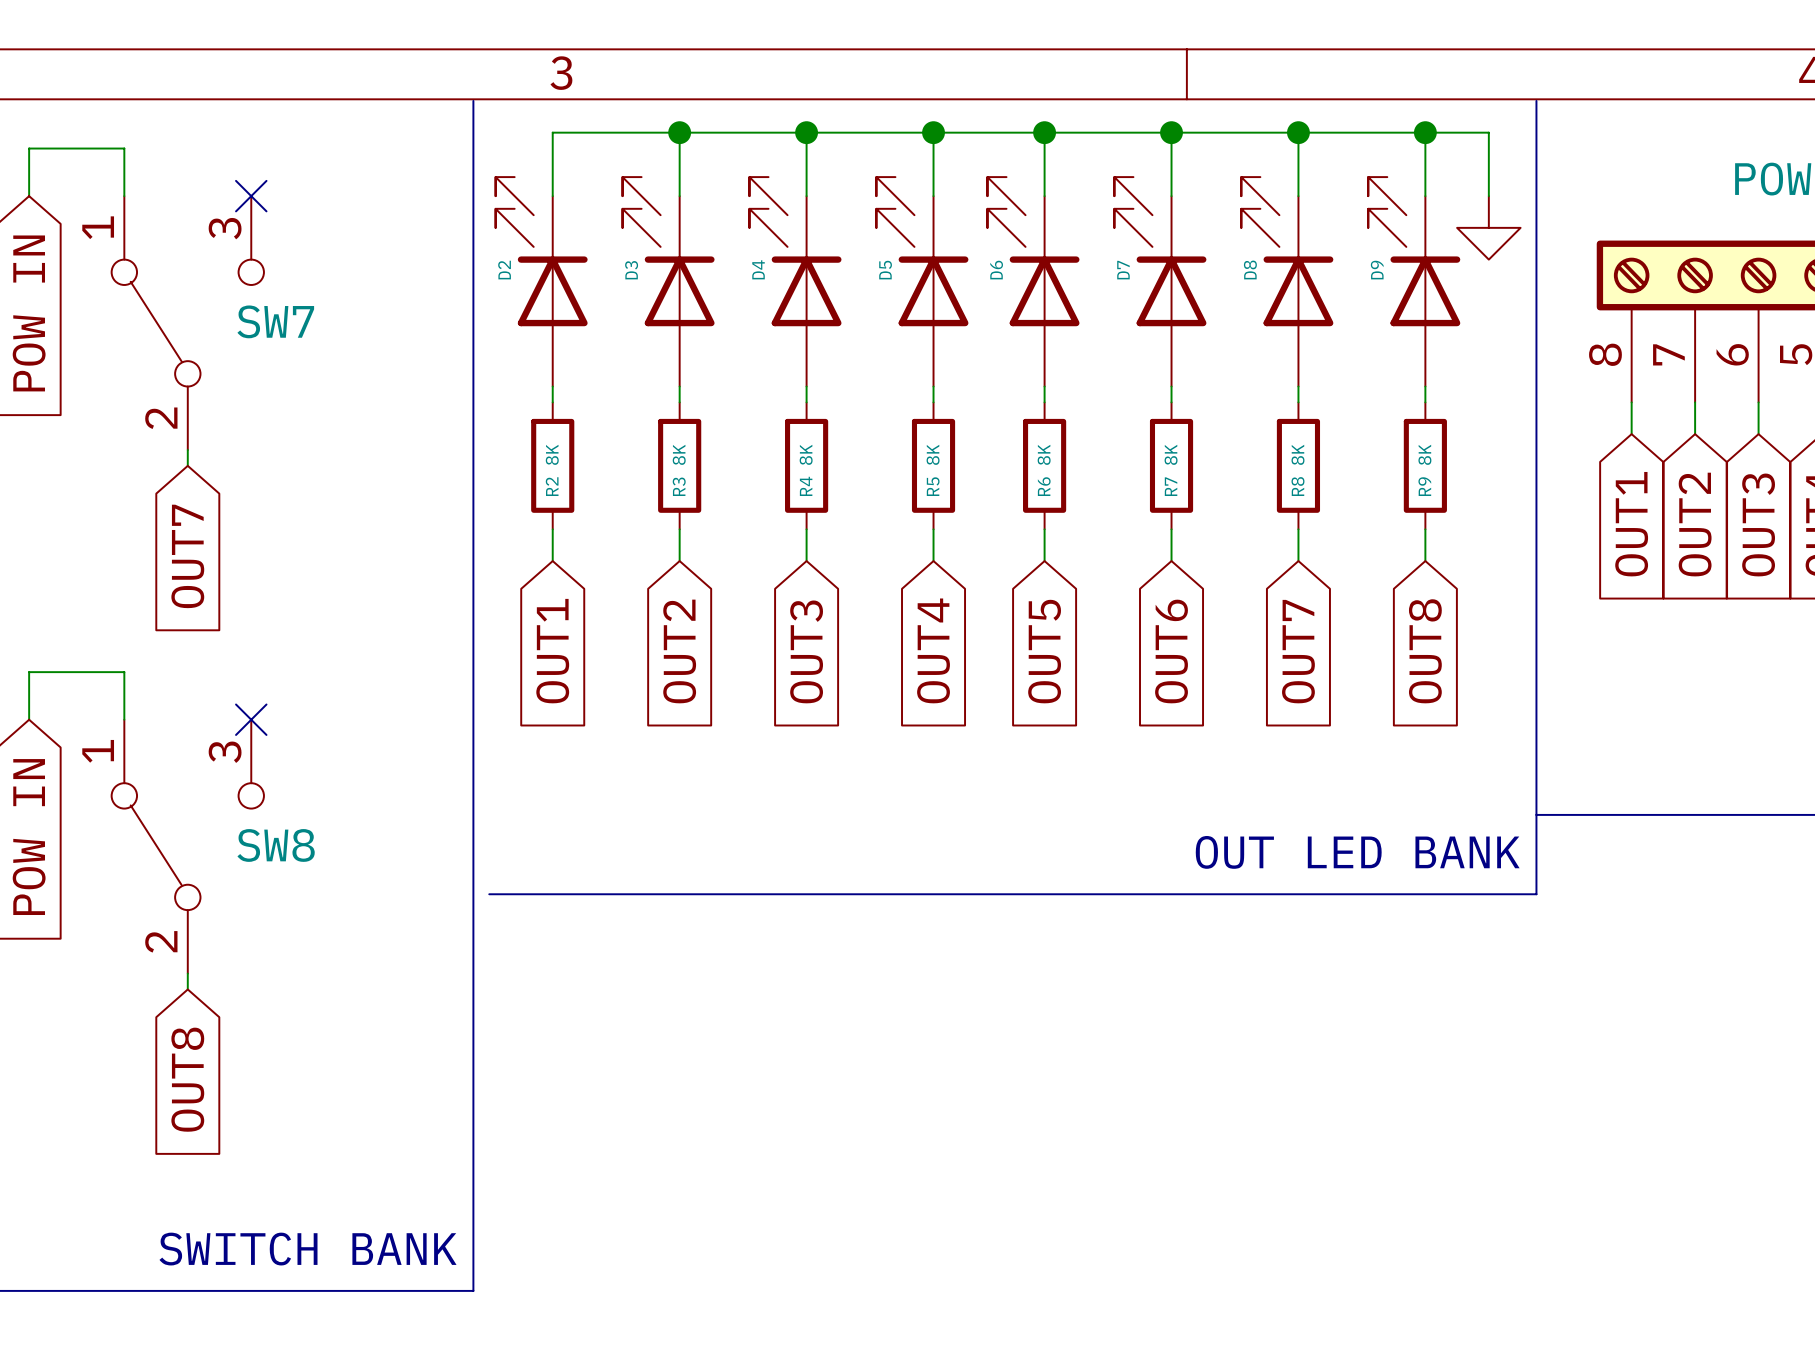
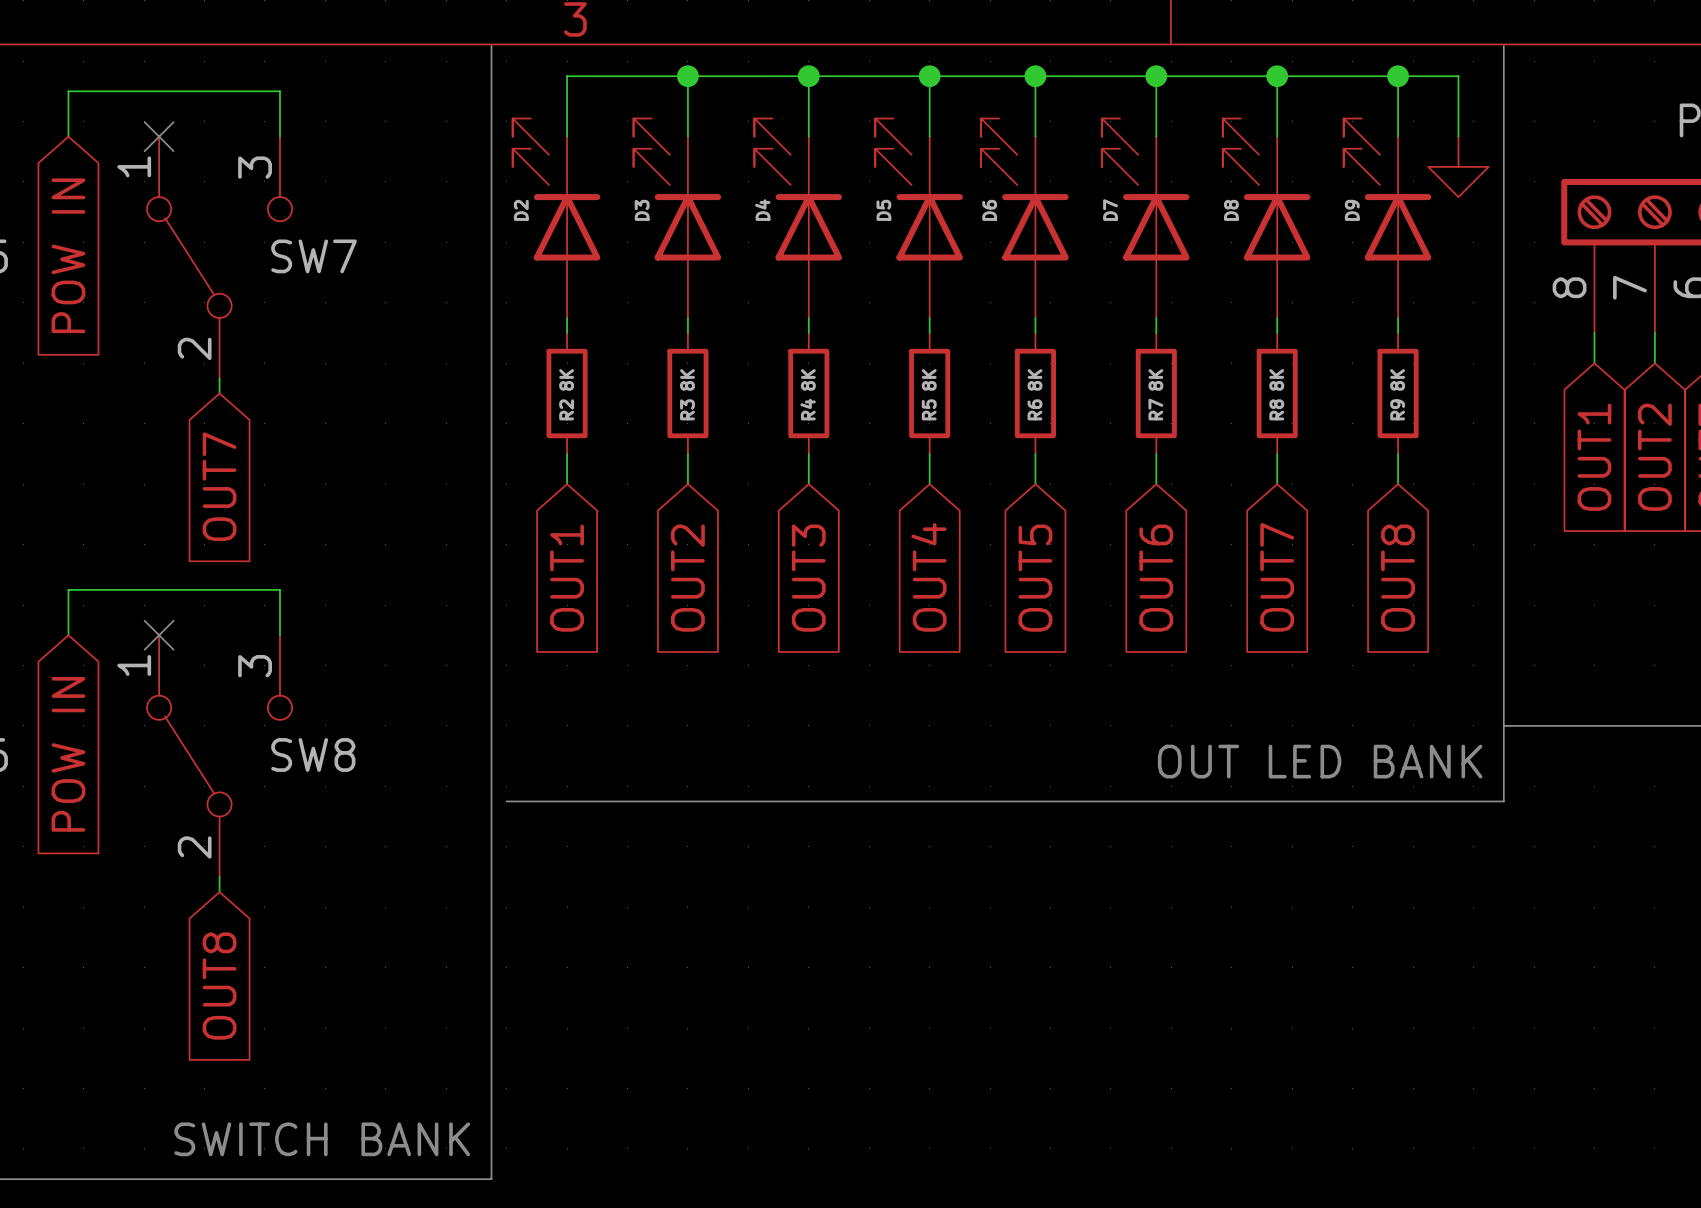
wire: (124, 148) (124, 196) -> (159, 91) (279, 91) (279, 136)
no-connect mark: none -> (159, 136)
no-connect mark: (251, 196) -> none
wire: (124, 672) (124, 719) -> (159, 589) (279, 589) (279, 635)
no-connect mark: none -> (159, 635)
no-connect mark: (251, 719) -> none

